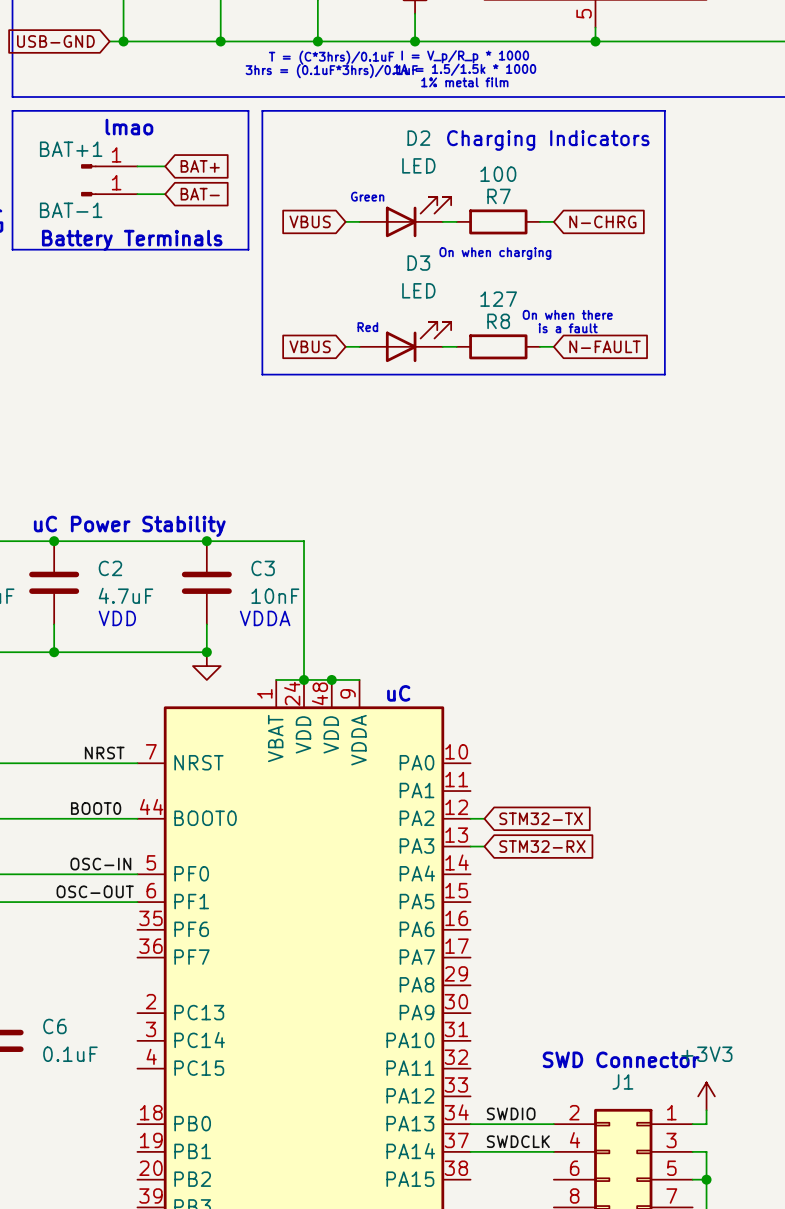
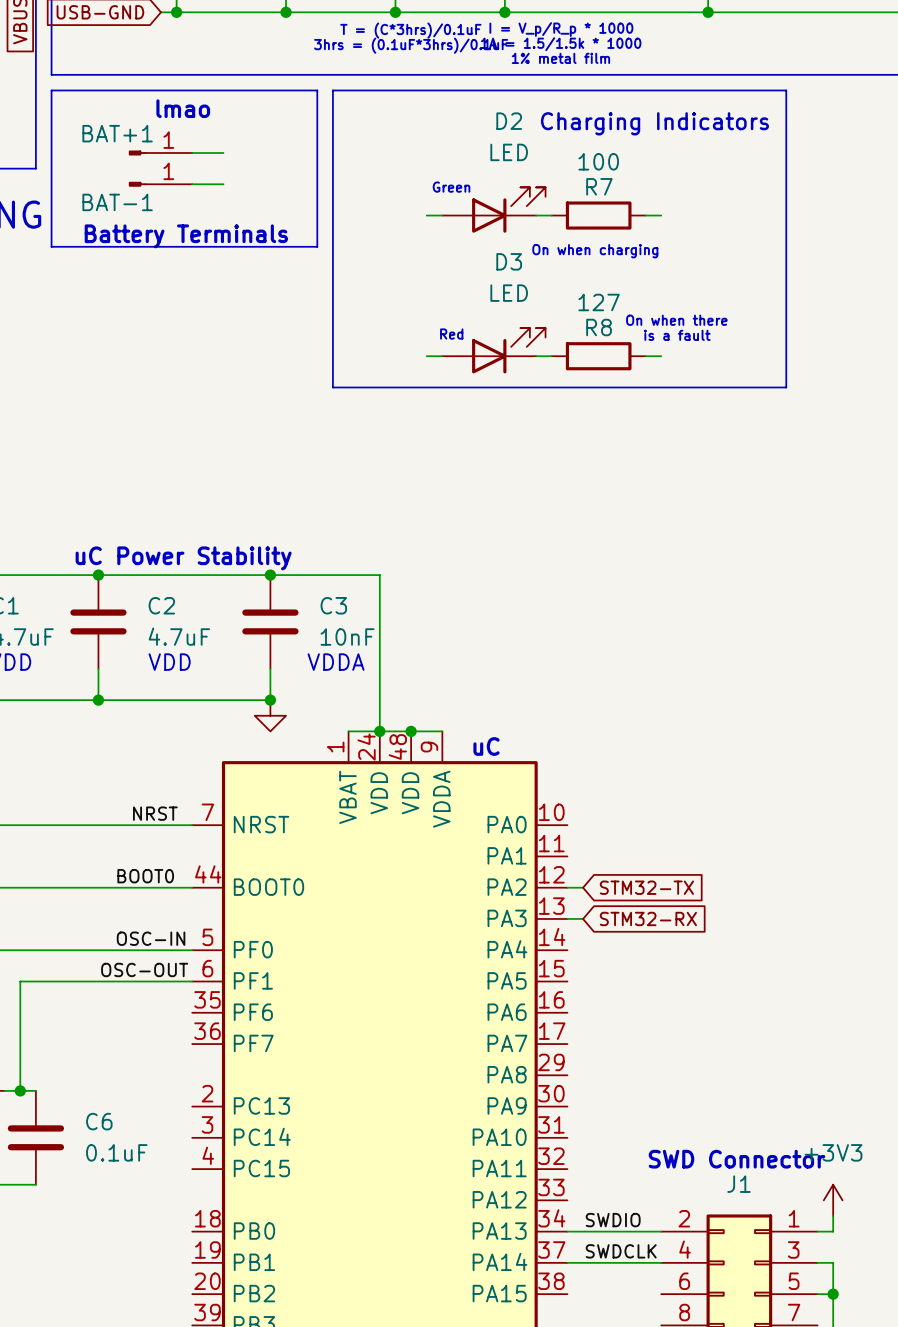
global label: BAT+ (200, 166) -> none
global label: BAT- (200, 194) -> none
global label: VBUS (310, 221) -> none
global label: N-CHRG (602, 221) -> none
global label: VBUS (310, 346) -> none
global label: N-FAULT (604, 346) -> none

